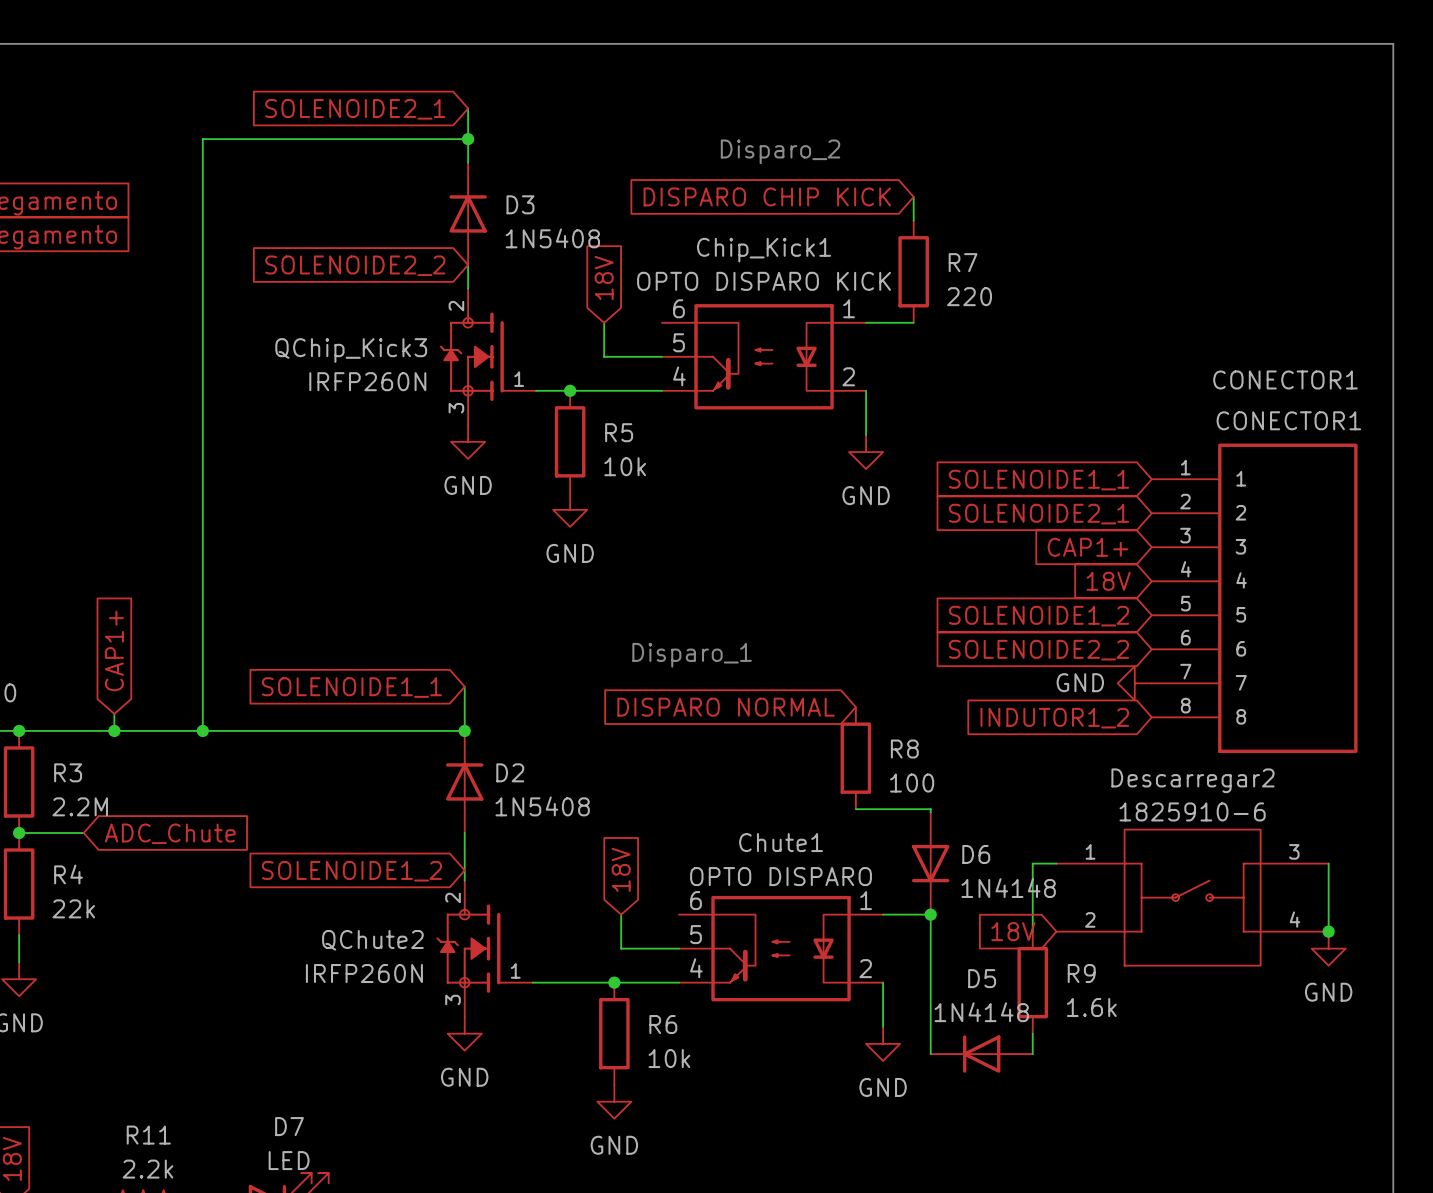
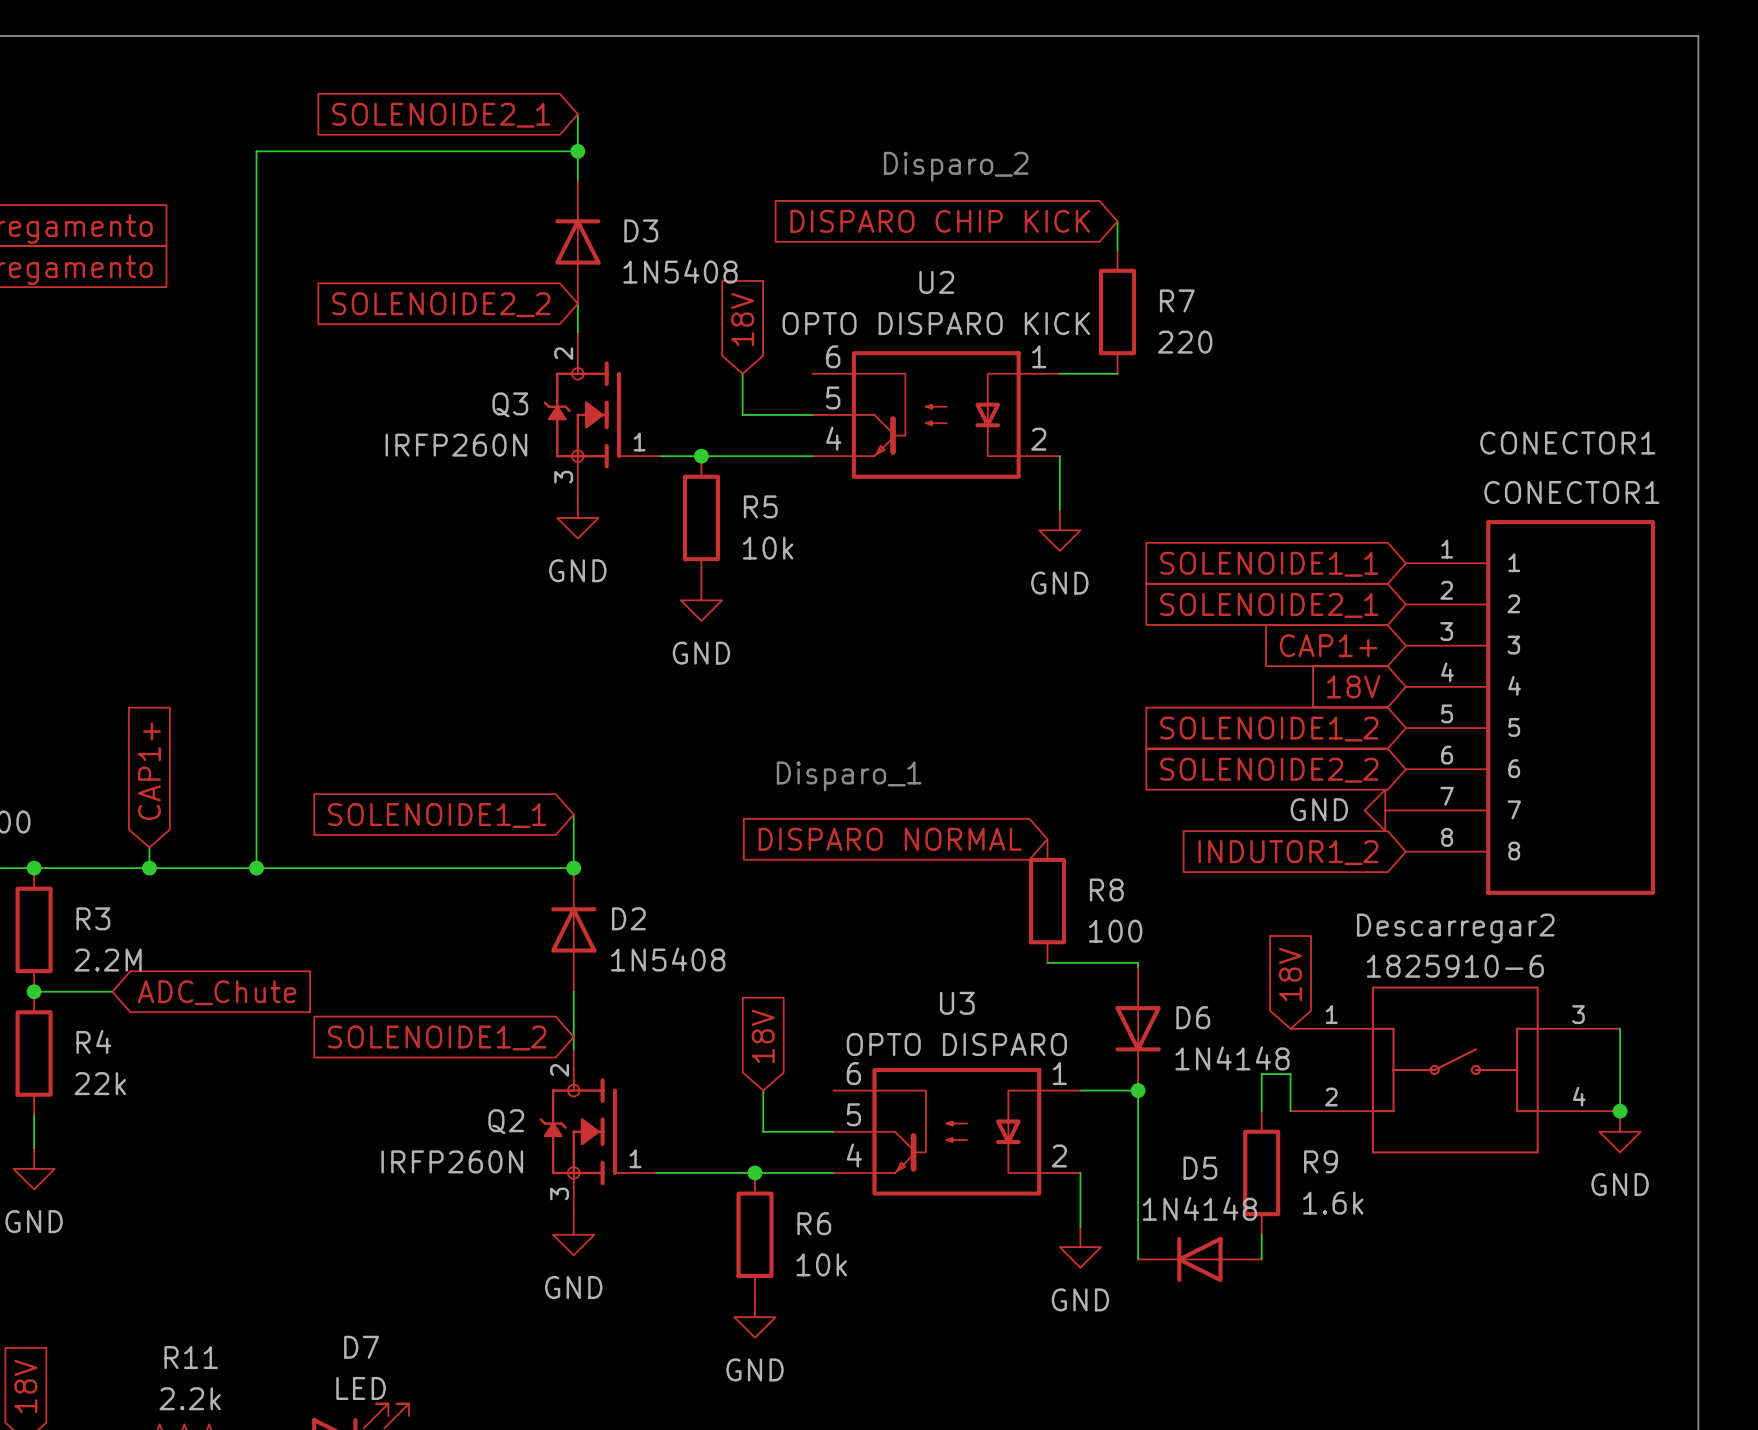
Chip_Kick1 name: Chip_Kick1 (764, 250) -> U2 (936, 282)
QChip_Kick3 name: QChip_Kick3 (351, 350) -> Q3 (510, 404)
Chute1 name: Chute1 (781, 842) -> U3 (957, 1003)
wire: (1056, 863) (1032, 863) (1032, 901) -> (1290, 1111) (1290, 1074) (1261, 1074)
global label rotation: 0° (1013, 931) -> 90° clockwise (1290, 974)
global label position: 18V (1013, 931) -> 18V (1290, 974)
QChute2 name: QChute2 (372, 940) -> Q2 (506, 1121)

